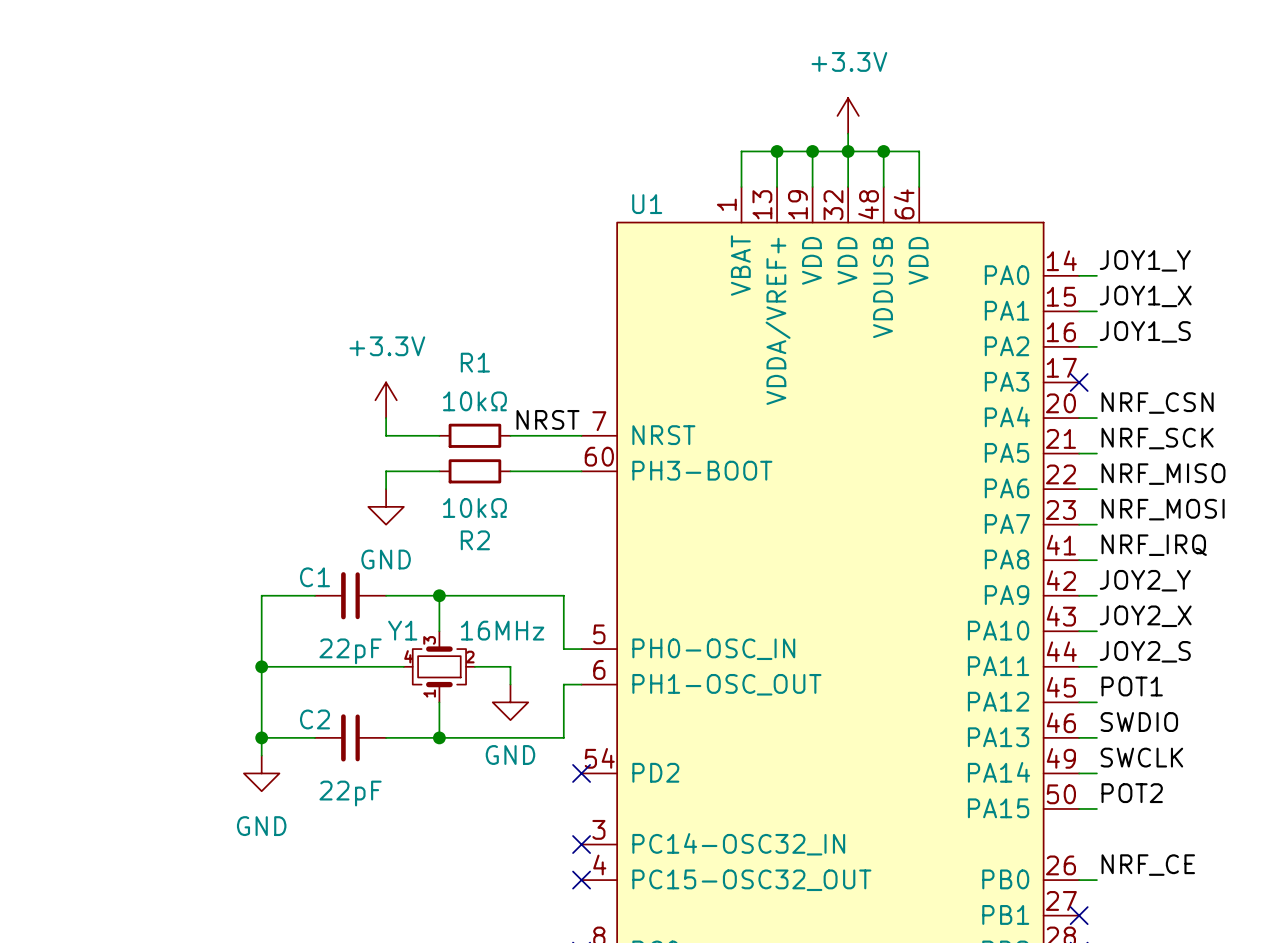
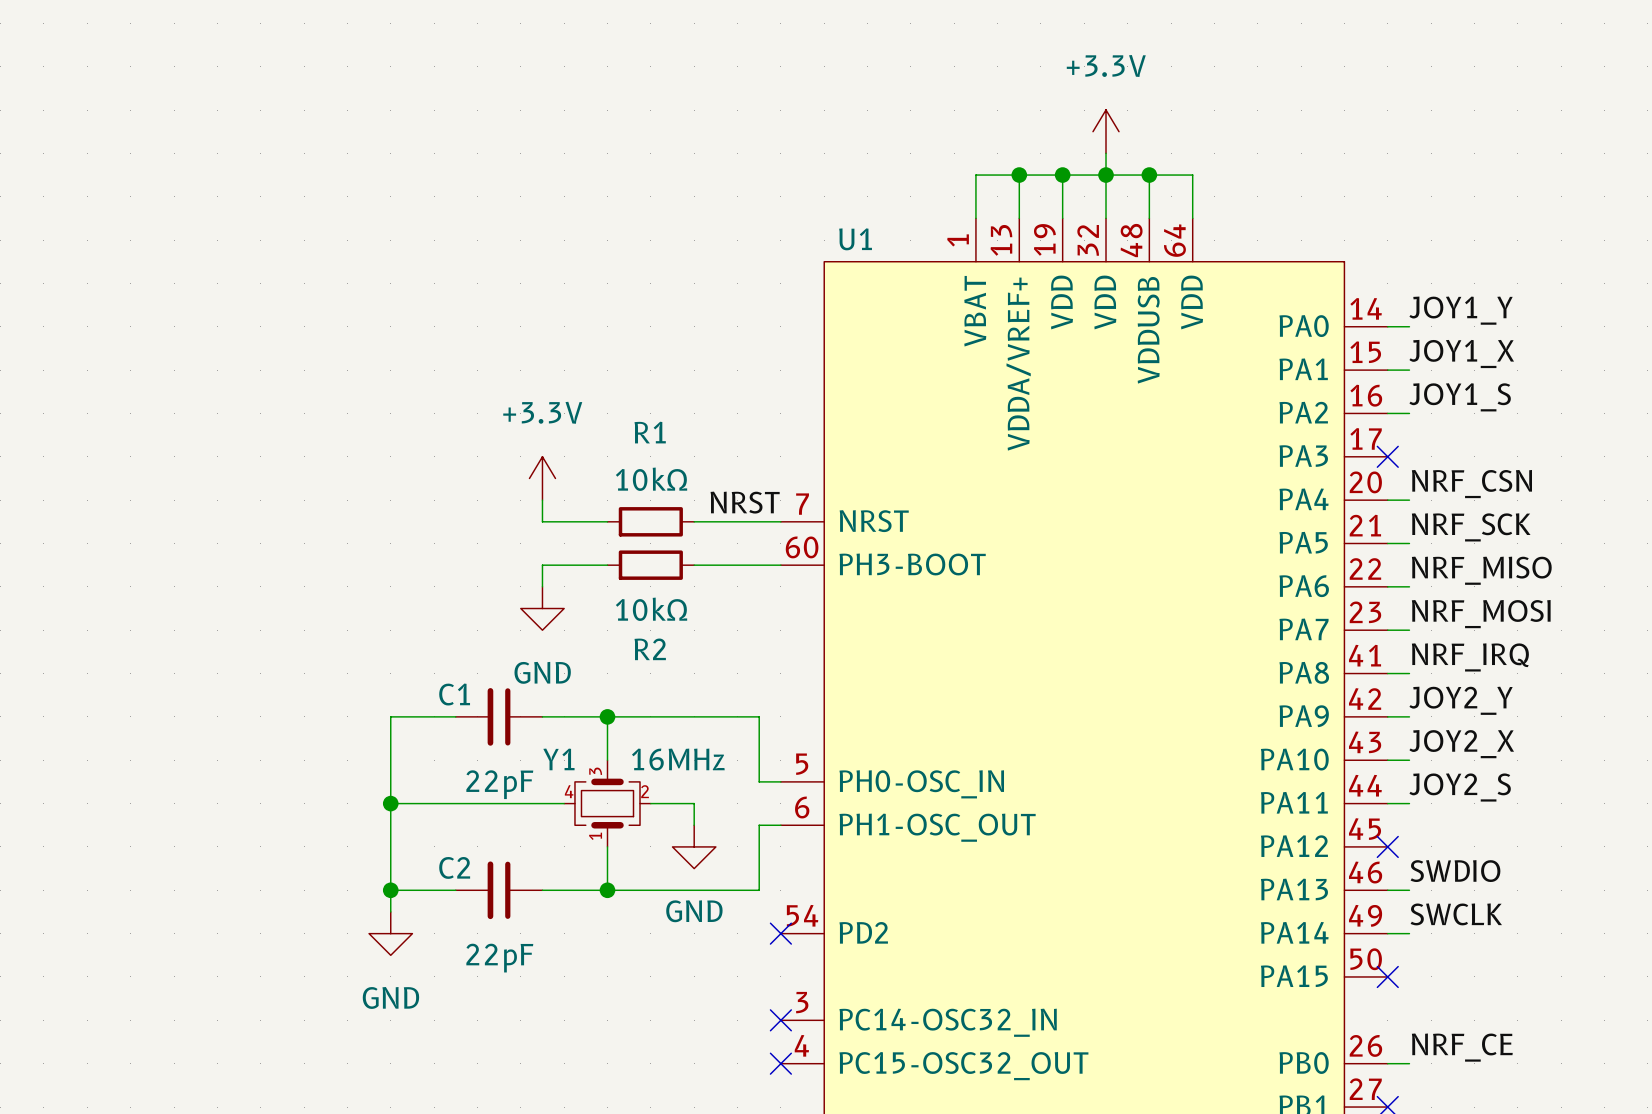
label: POT1 (1132, 686) -> none
wire: (1079, 702) (1096, 702) -> none
no-connect mark: none -> (1387, 846)
label: POT2 (1132, 793) -> none
wire: (1079, 808) (1096, 808) -> none
no-connect mark: none -> (1387, 976)

